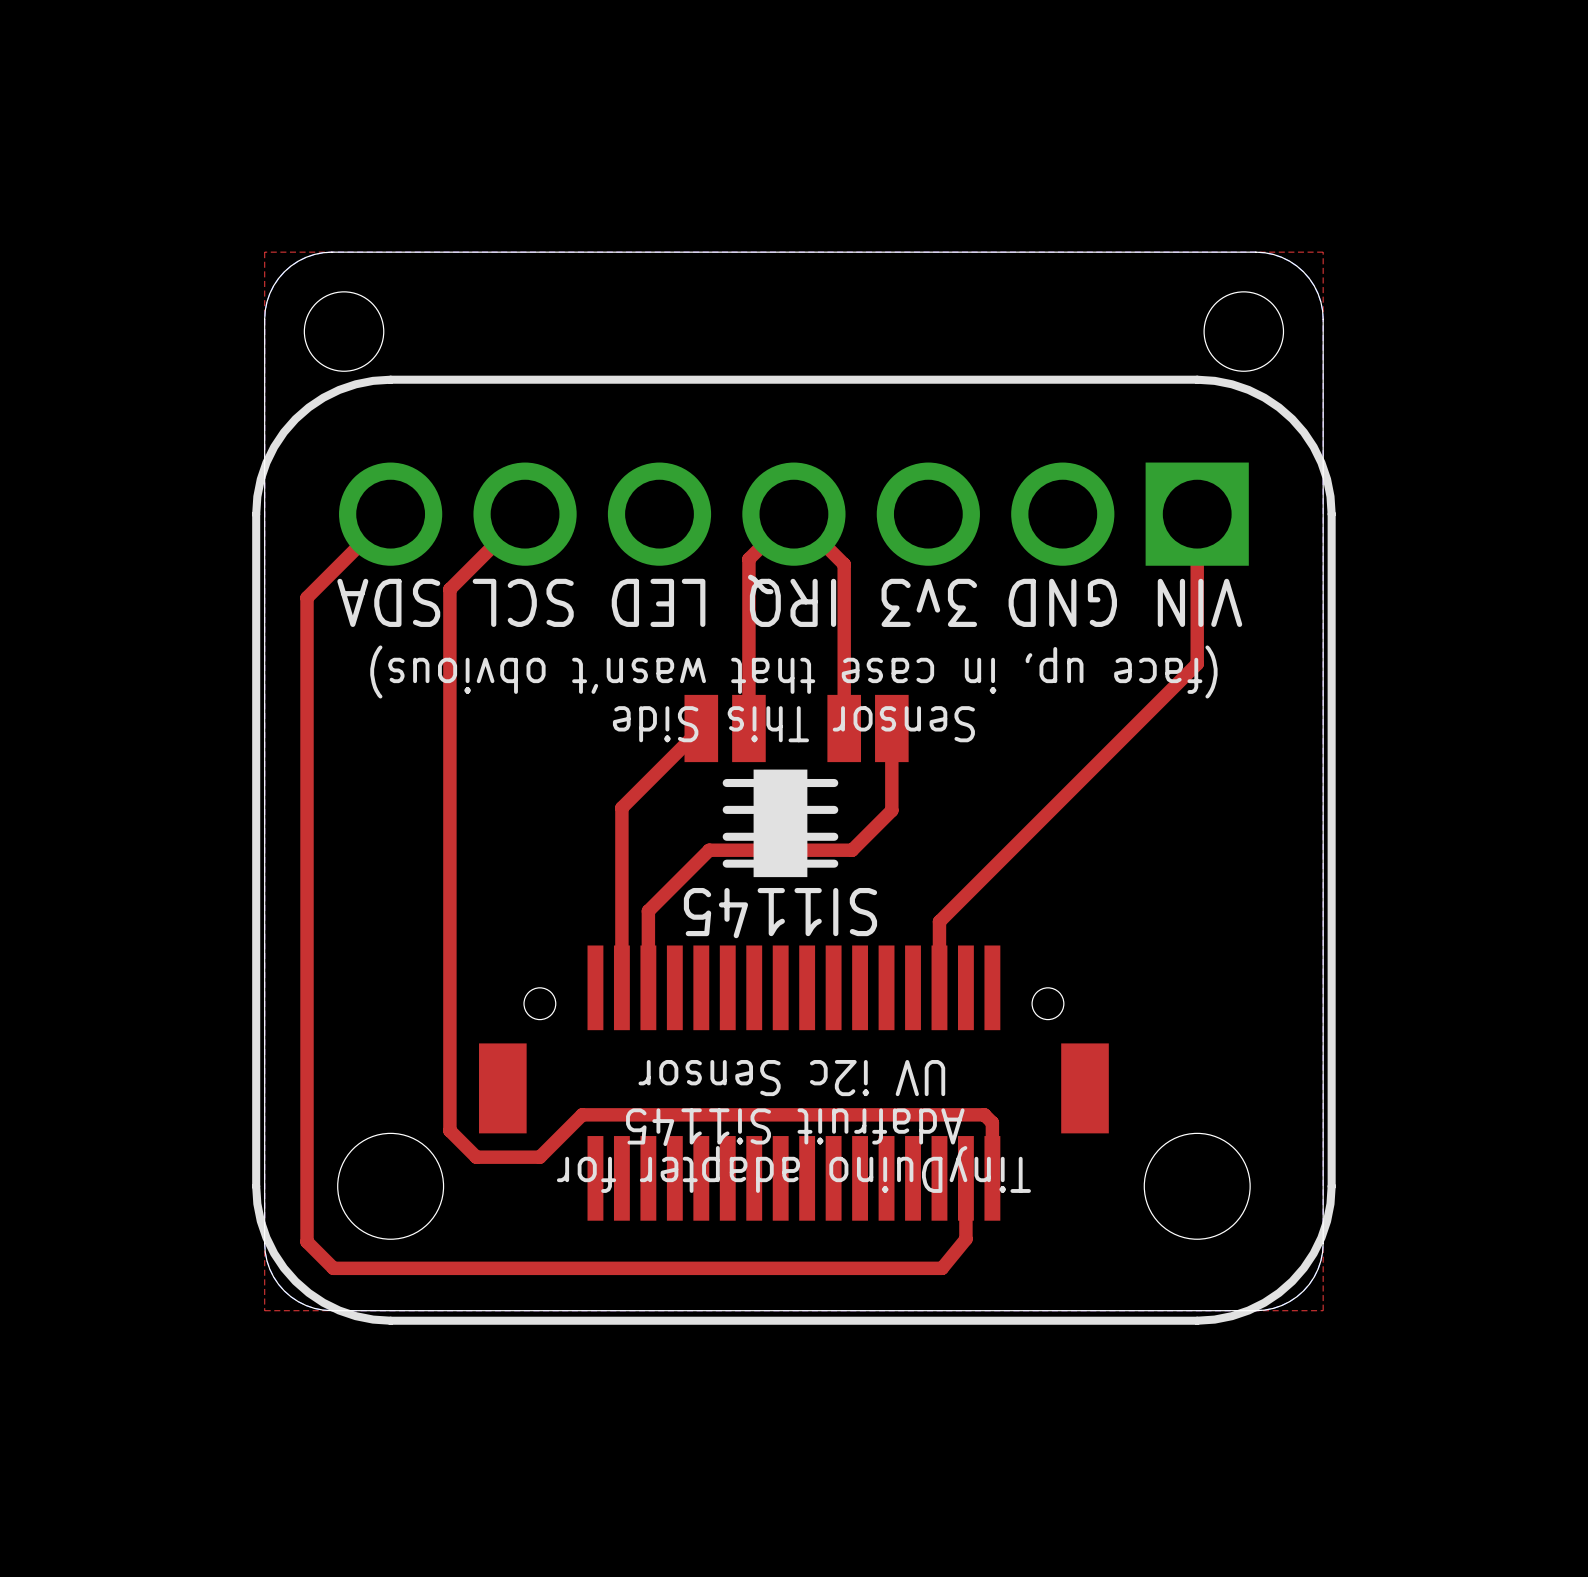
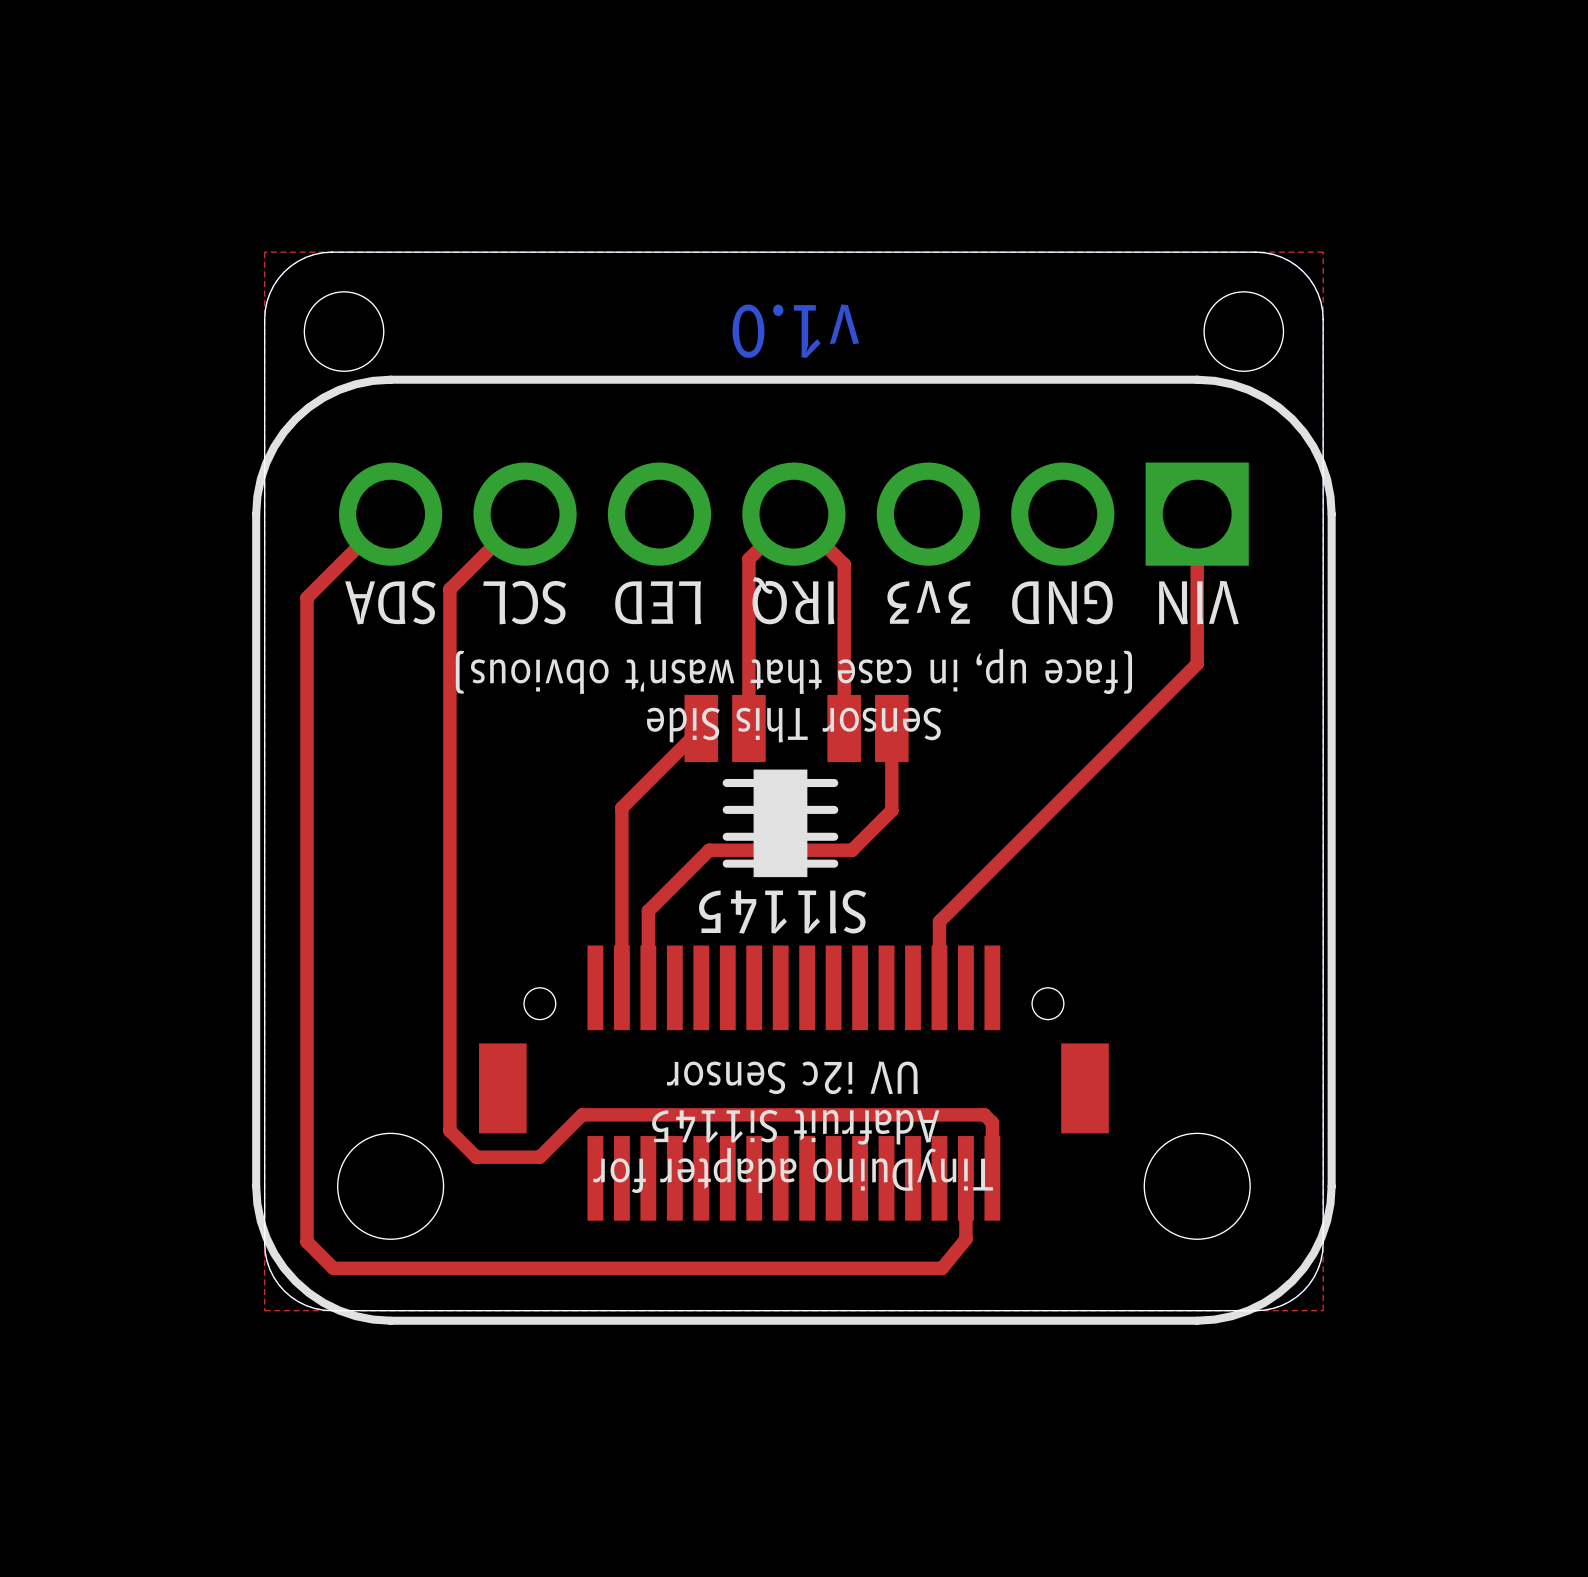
text: none -> v1.0 (795, 331)

